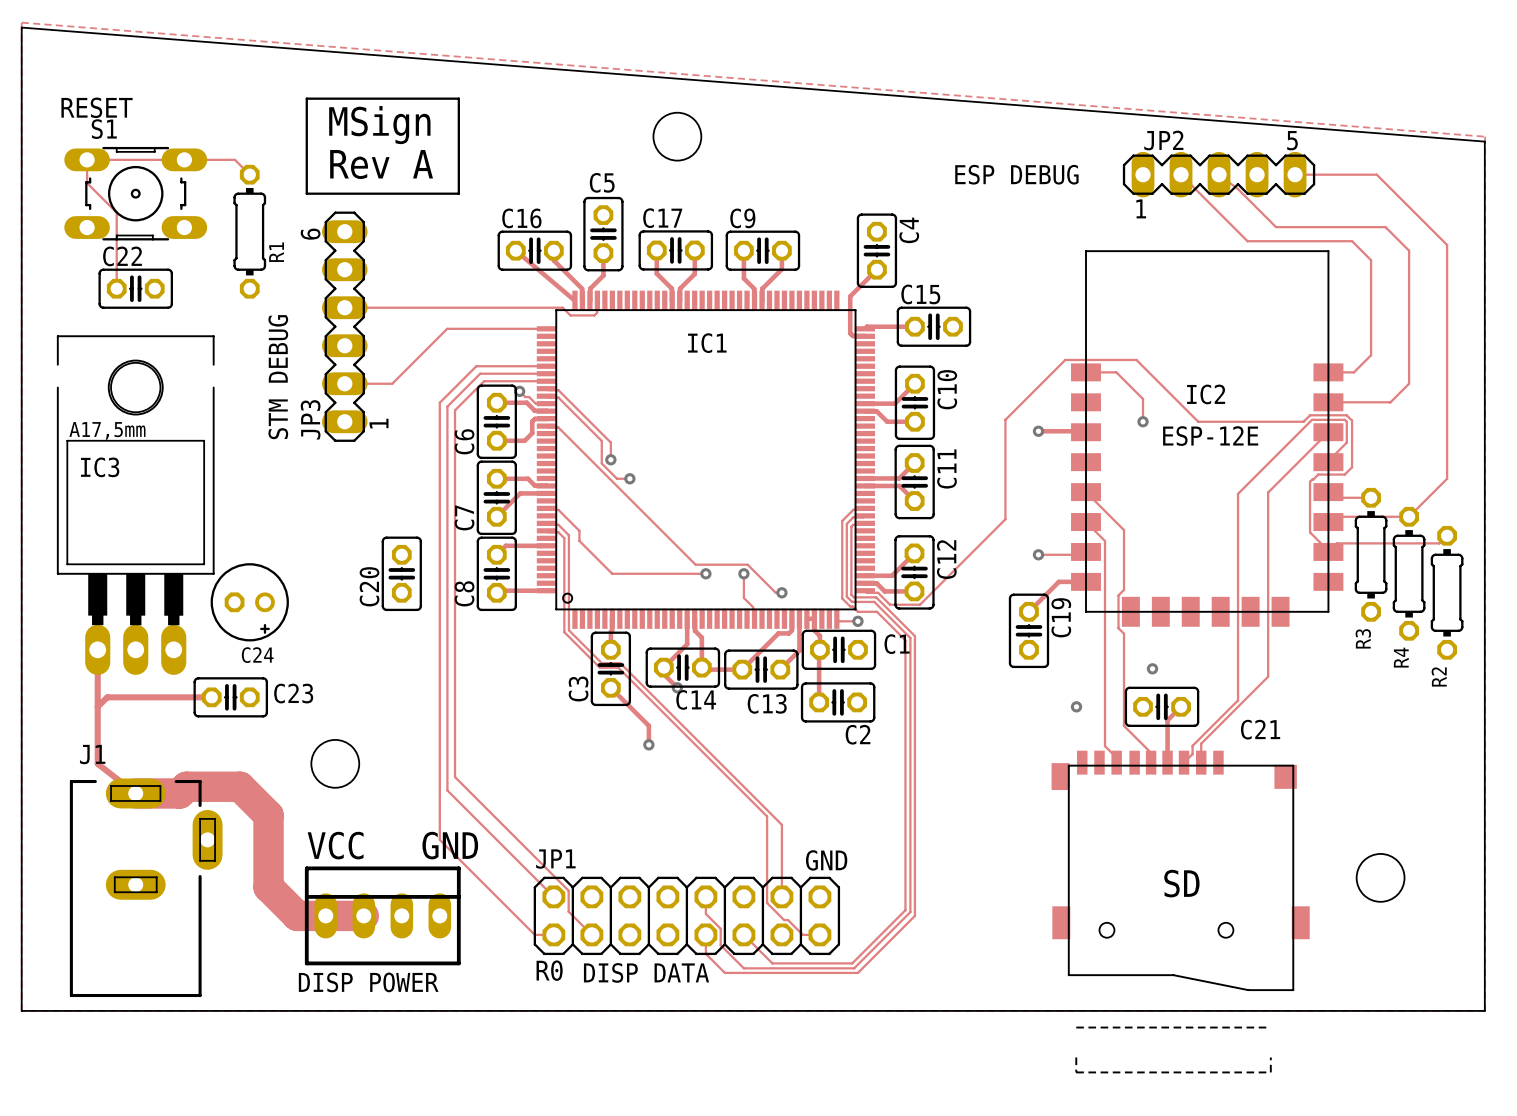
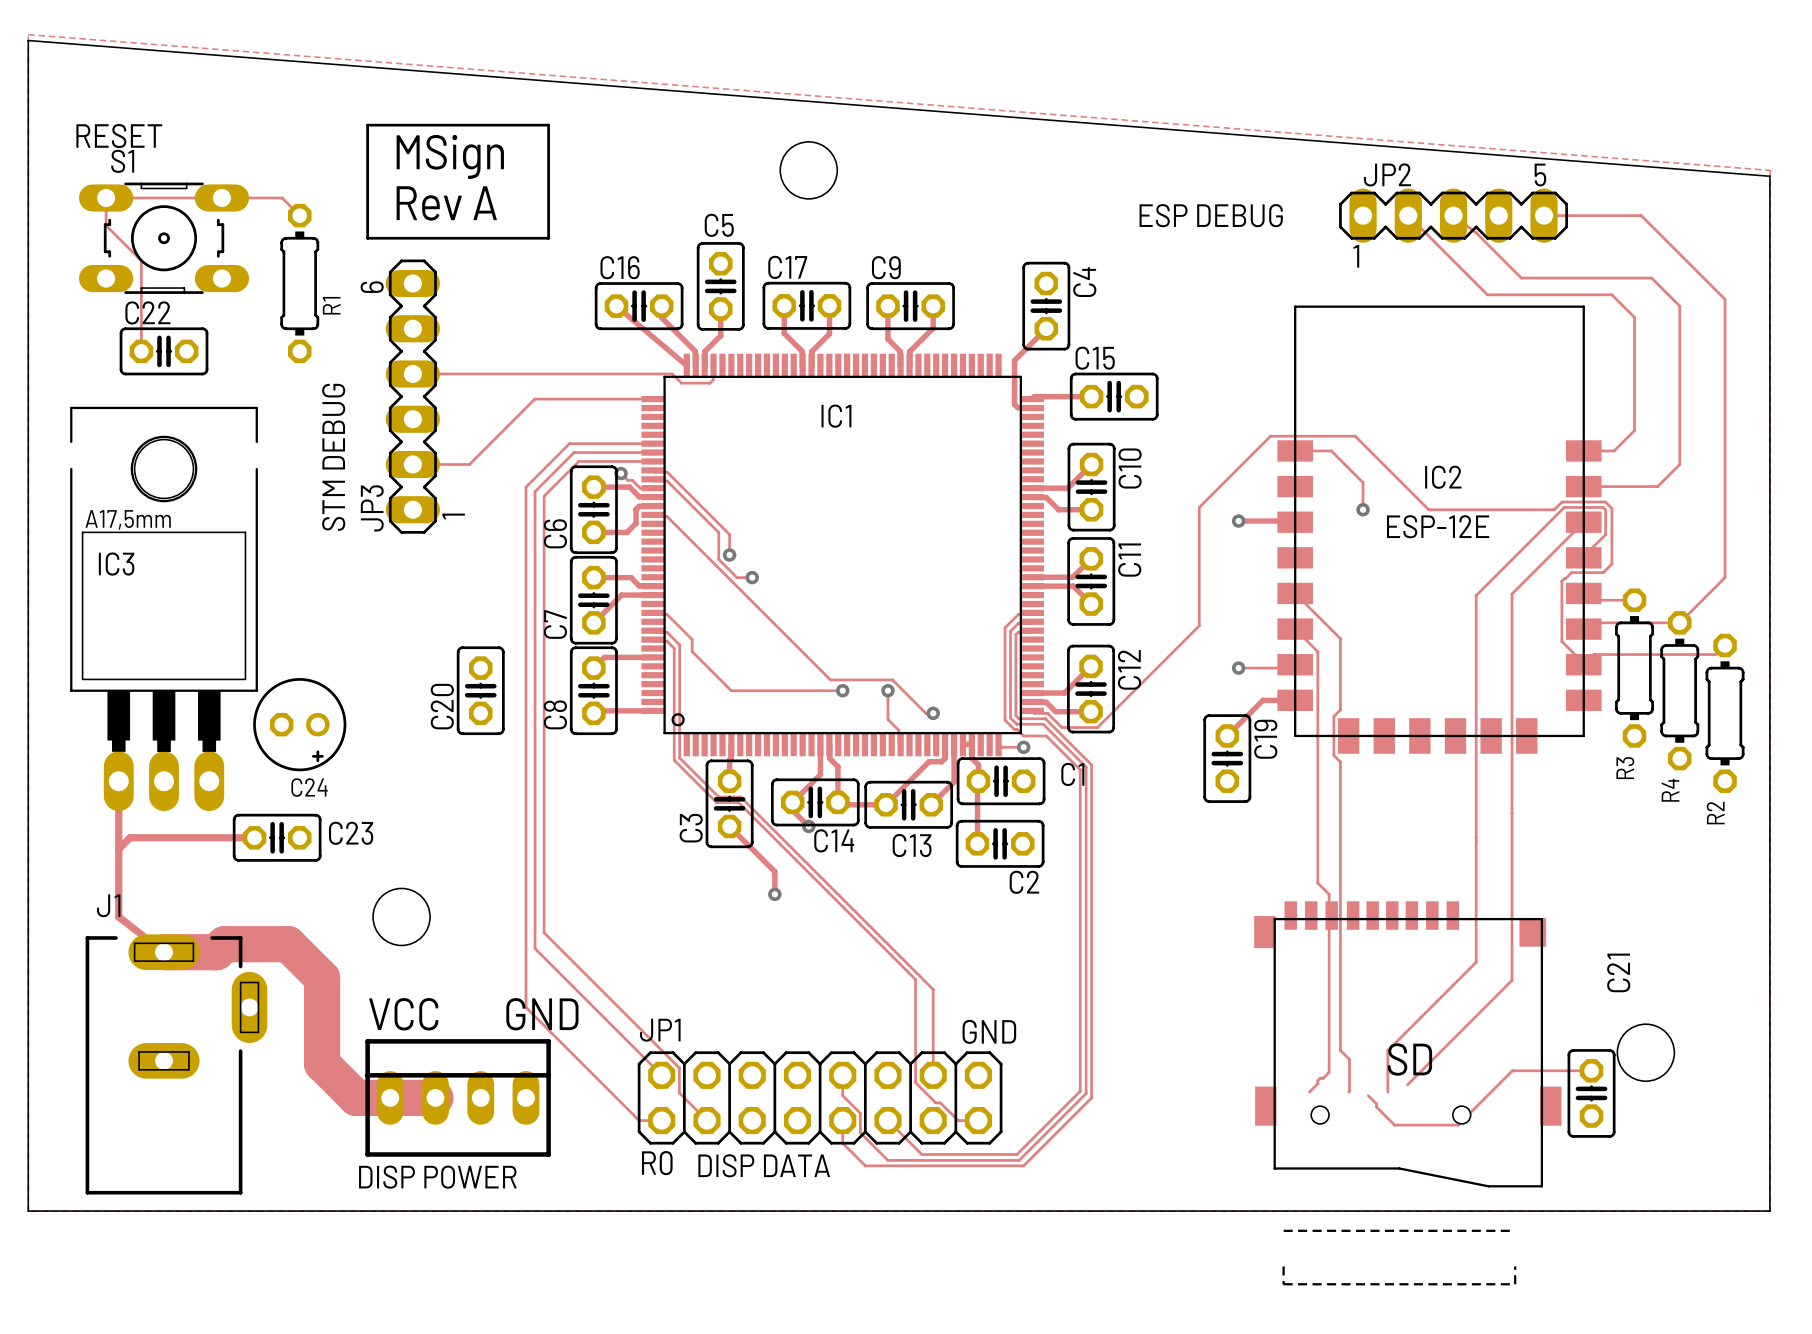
via: (1152, 668) -> none
track: (1268, 676) (1201, 743) (1201, 762) -> (1512, 813) (1512, 980) (1407, 1084)
track: (1238, 700) (1192, 745) (1192, 754) (1184, 762) -> (1476, 841) (1476, 962) (1387, 1050) (1387, 1092)
via: (1076, 706) -> none
C21 rotation: 0° (1162, 706) -> 90° clockwise (1591, 1093)
C21 position: (1162, 706) -> (1591, 1093)
track: (1181, 706) (1167, 720) (1167, 762) -> none
track: (1124, 725) (1151, 752) (1151, 762) -> (1340, 871) (1340, 1050) (1349, 1059) (1348, 1092)
C21 name position: C21 (1260, 729) -> C21 (1618, 972)
track: (1105, 735) (1105, 746) (1116, 757) (1116, 762) -> (1317, 883) (1329, 894) (1329, 1072) (1317, 1080) (1317, 1083) (1309, 1092)
track: none -> (1591, 1070) (1512, 1070) (1458, 1125) (1394, 1125) (1368, 1095)

